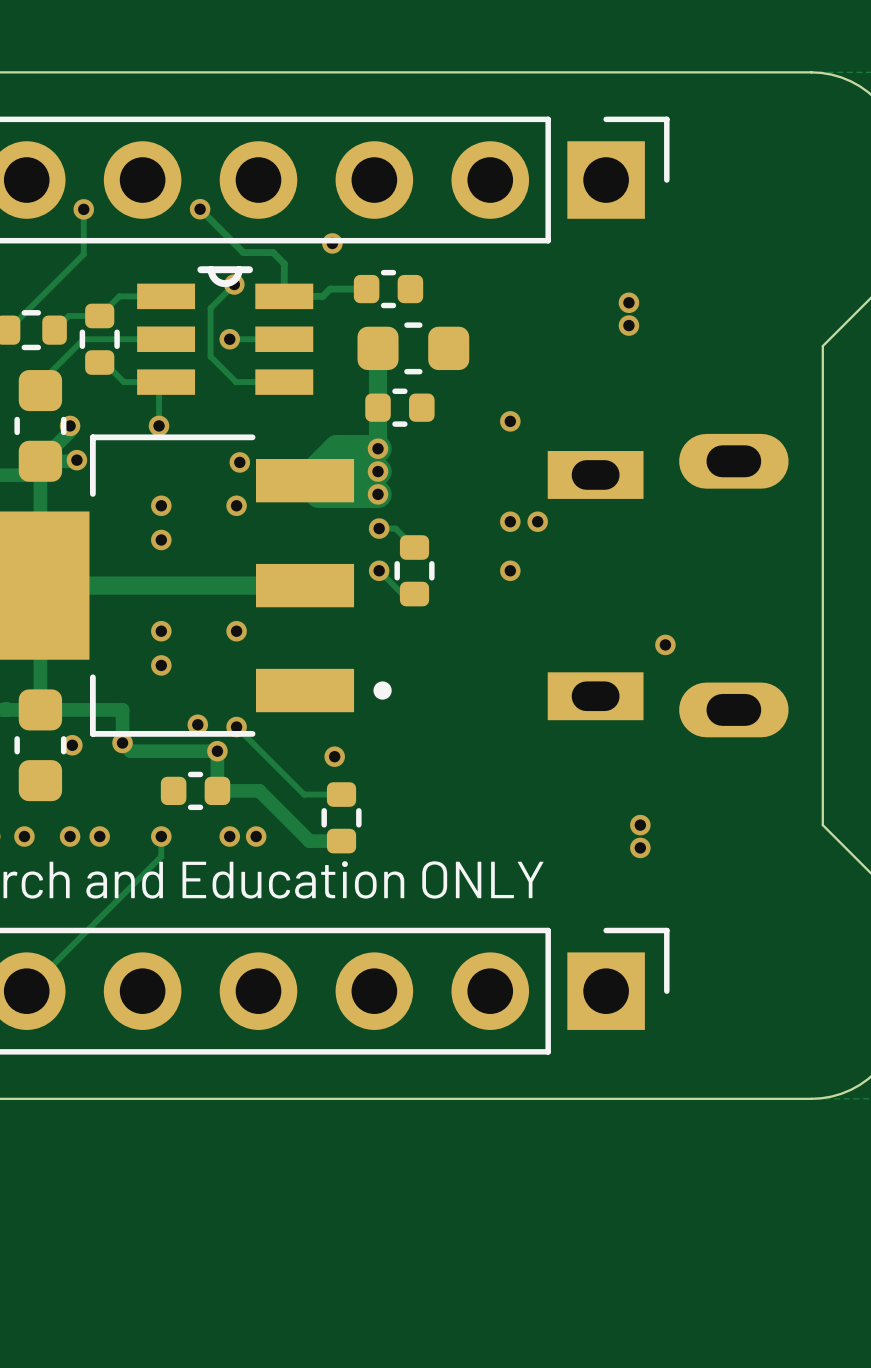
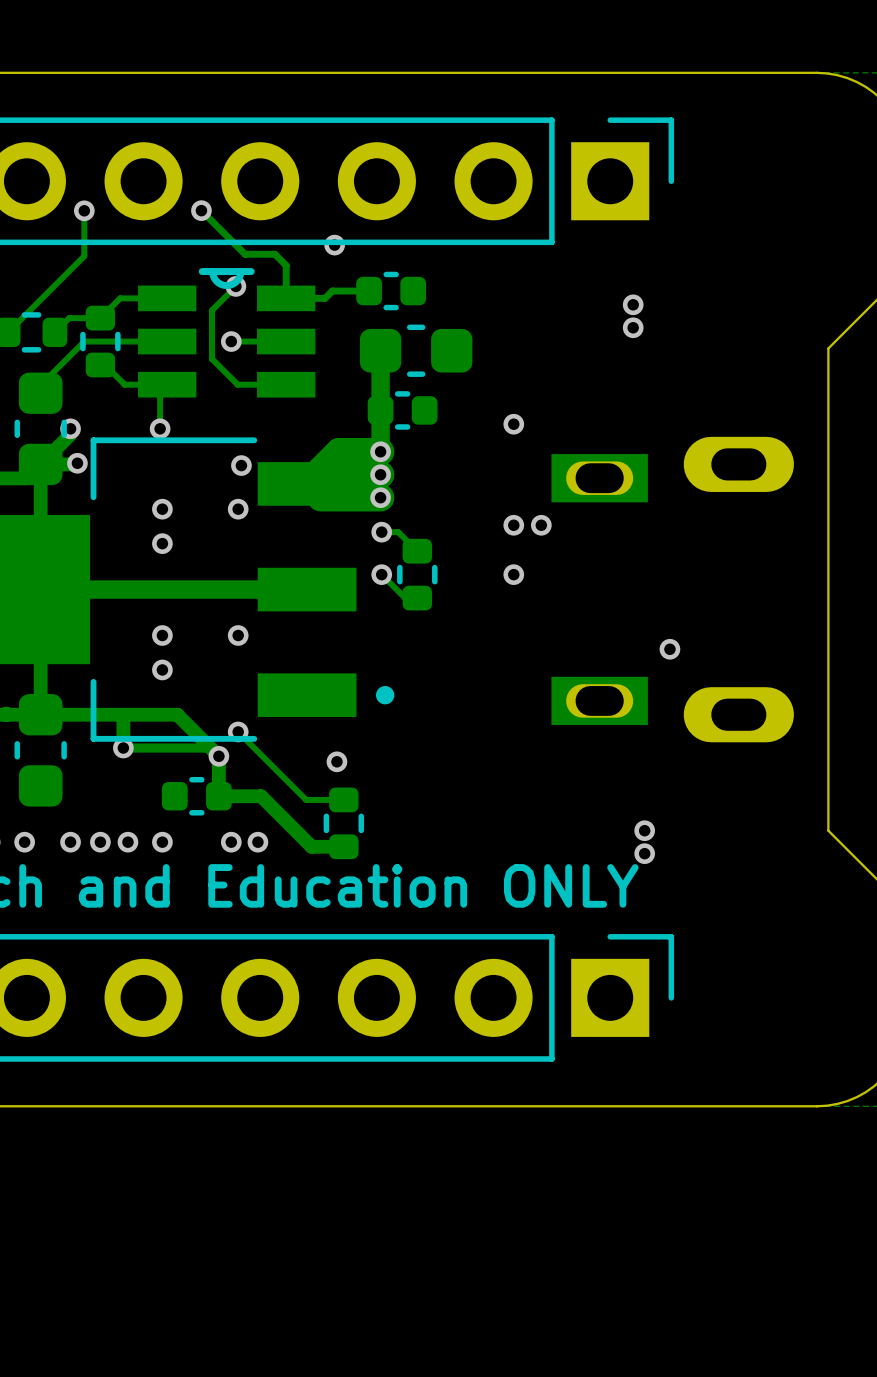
via: (197, 724) -> none
track: (122, 743) (130, 751) (217, 751) -> (123, 748) (210, 748) (218, 756) (177, 714) (123, 714)
via: (72, 745) -> none
via: none -> (127, 842)
track: (161, 836) (161, 856) (26, 991) -> none

